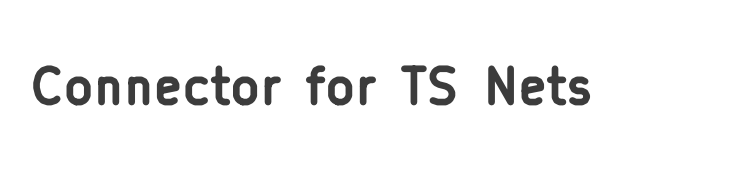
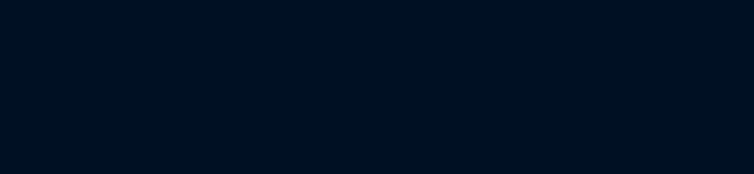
text: Connector for TS Nets (311, 85) -> none

